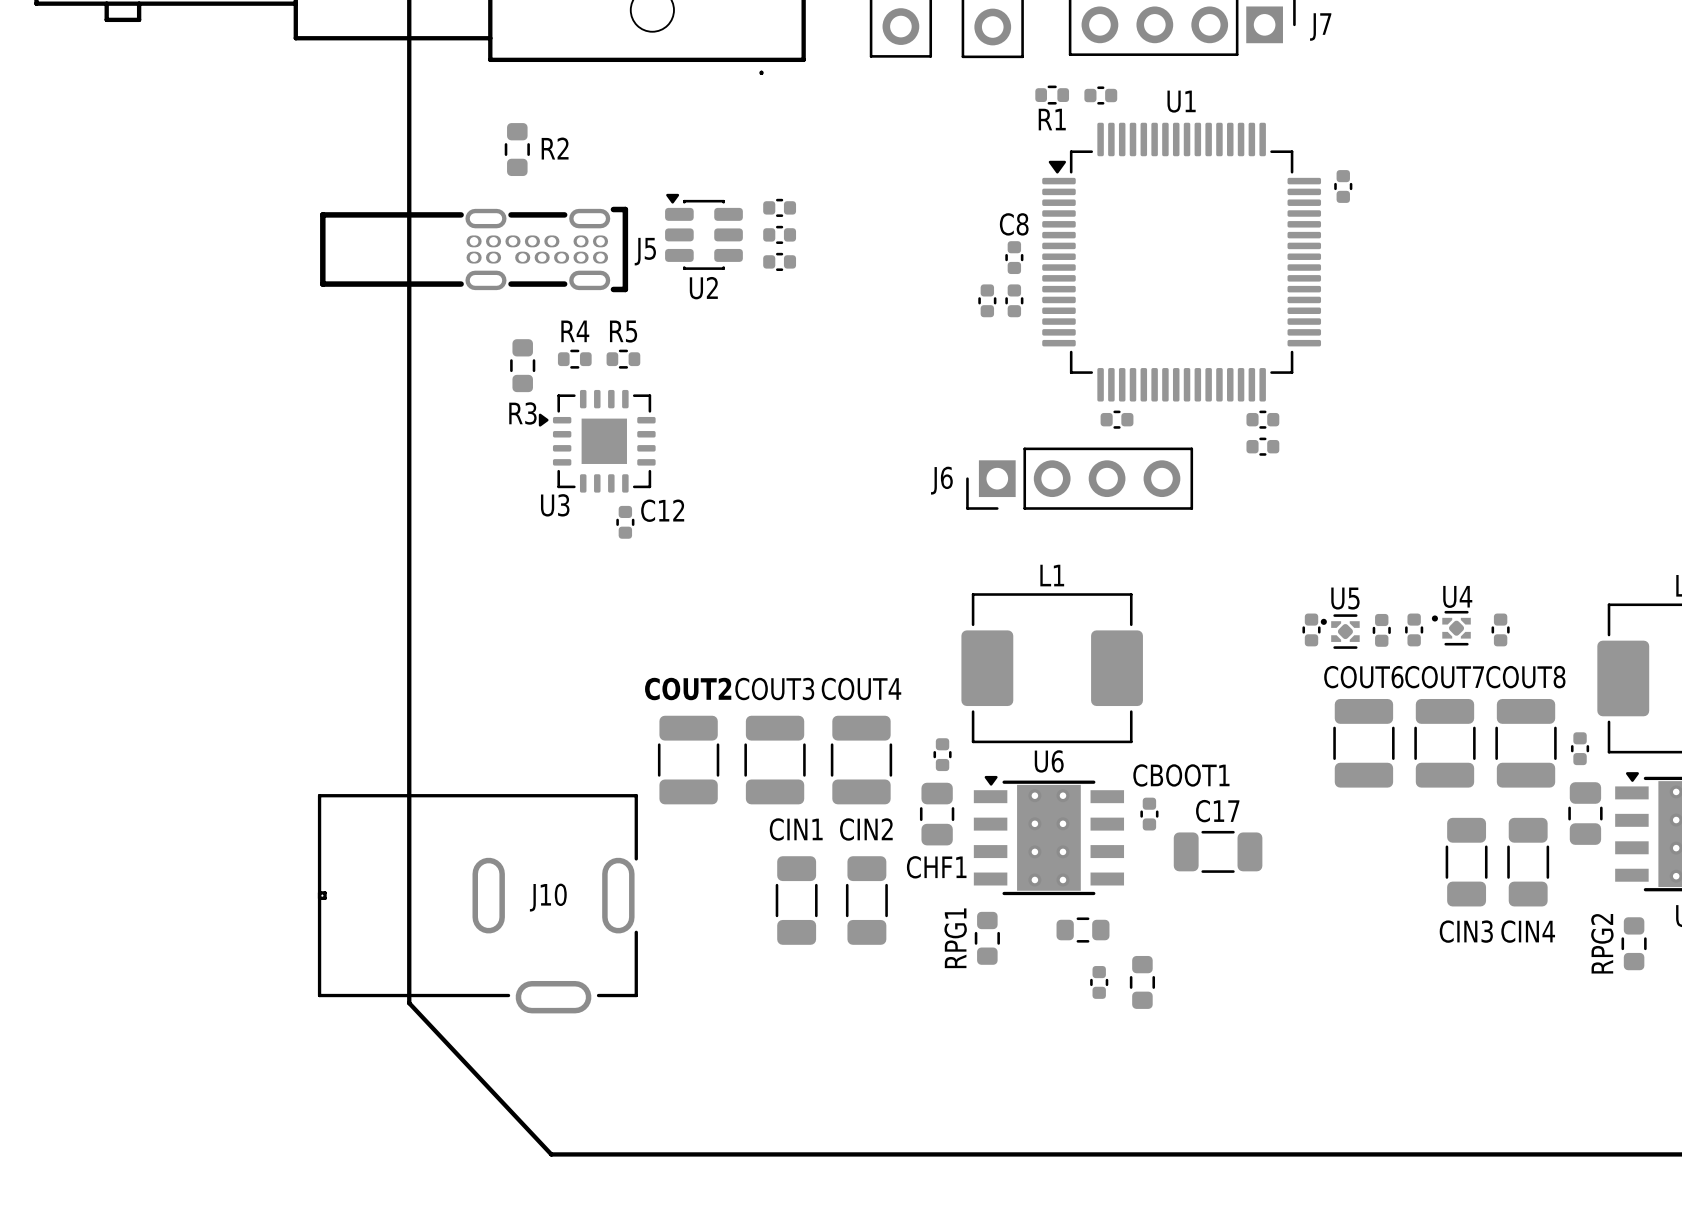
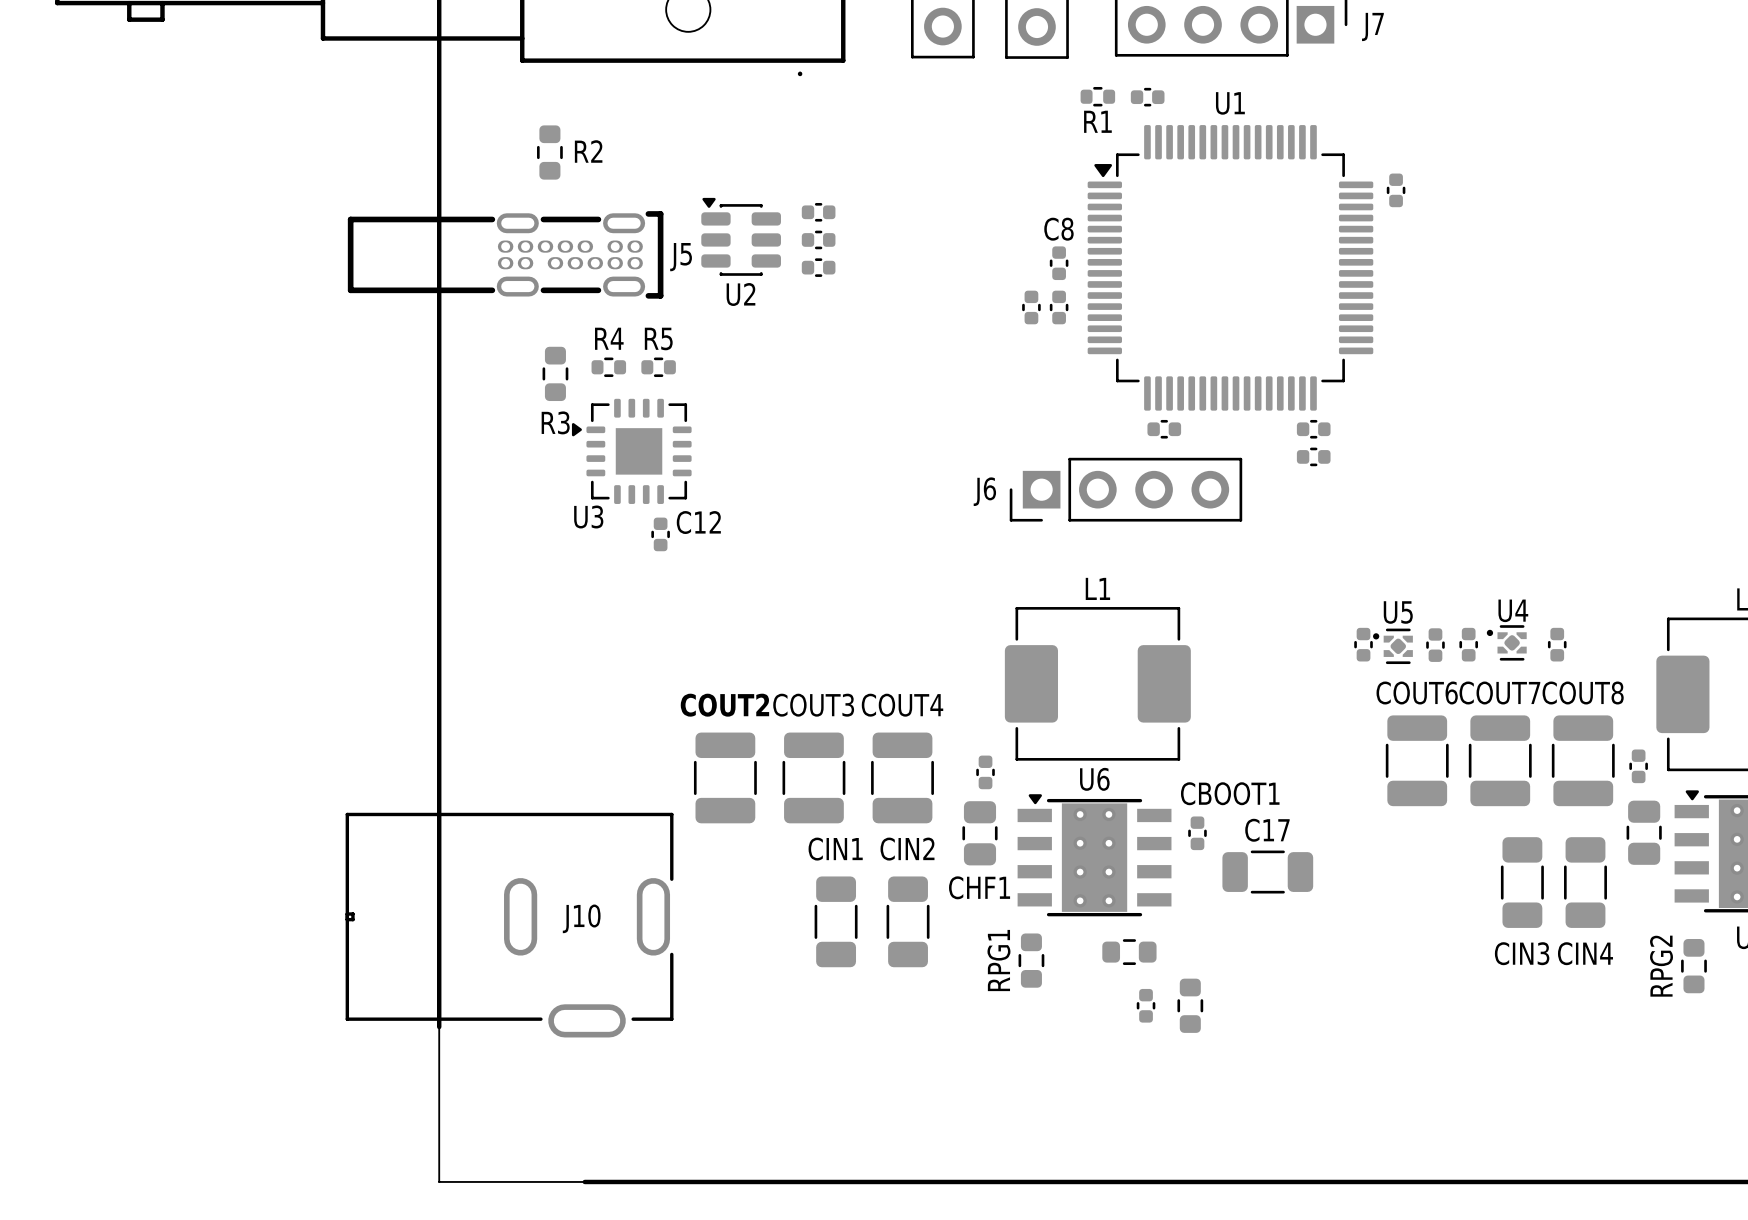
board edge: (409, 1003) (551, 1154) -> (439, 1027) (439, 1181) (584, 1181)

